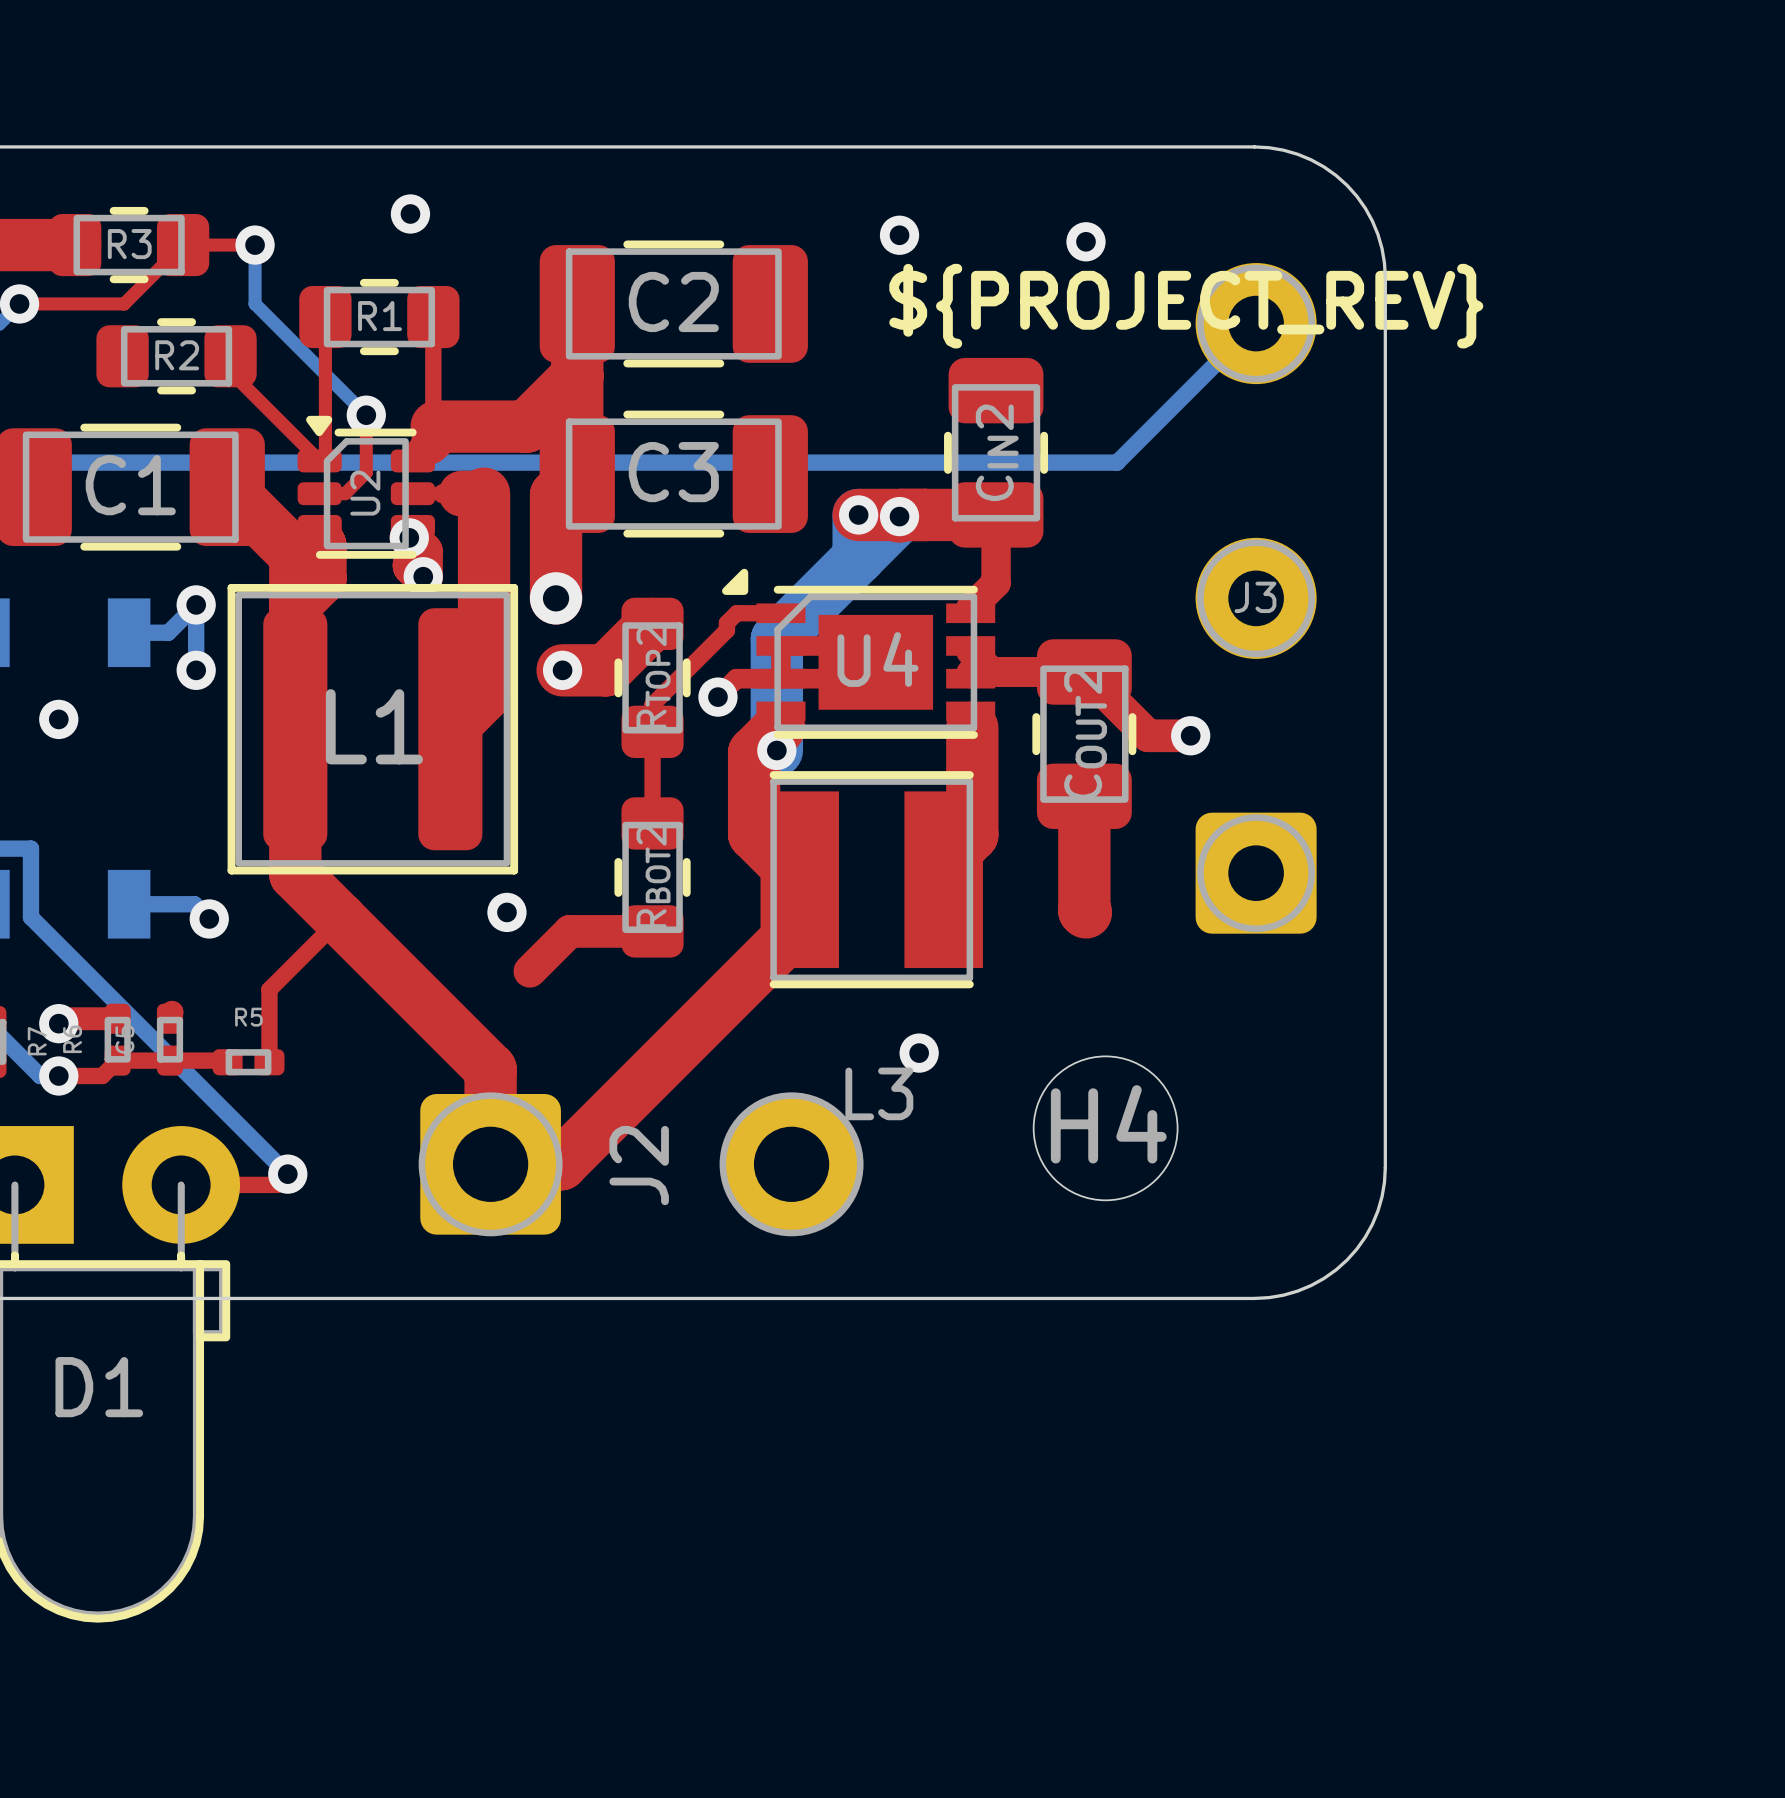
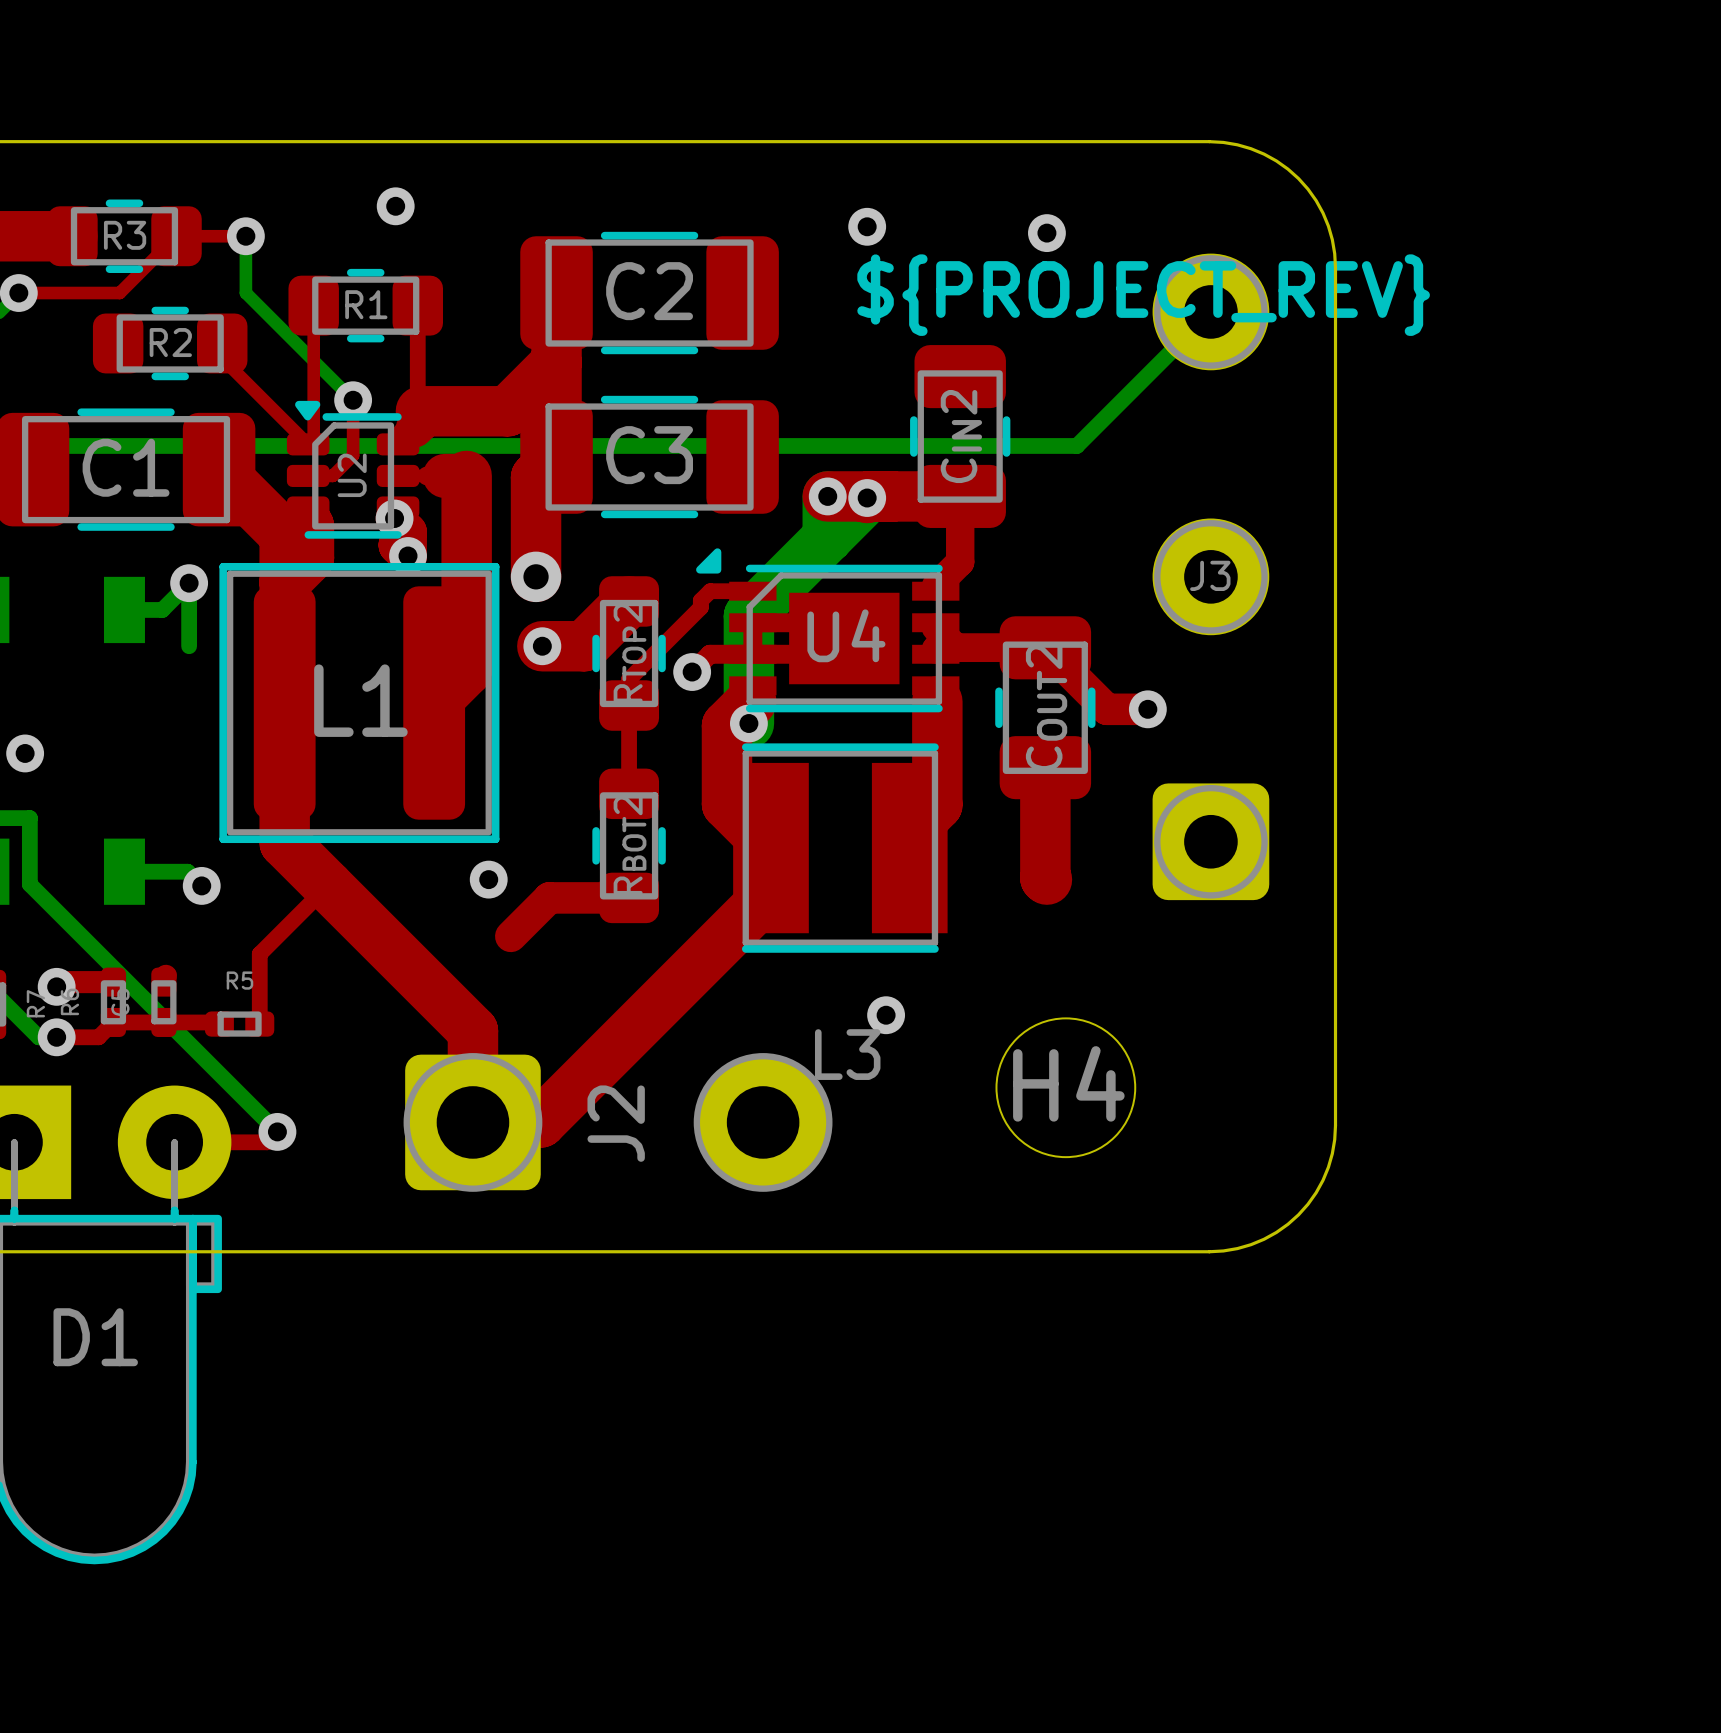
via: (196, 670) -> none
via position: (58, 719) -> (25, 753)

